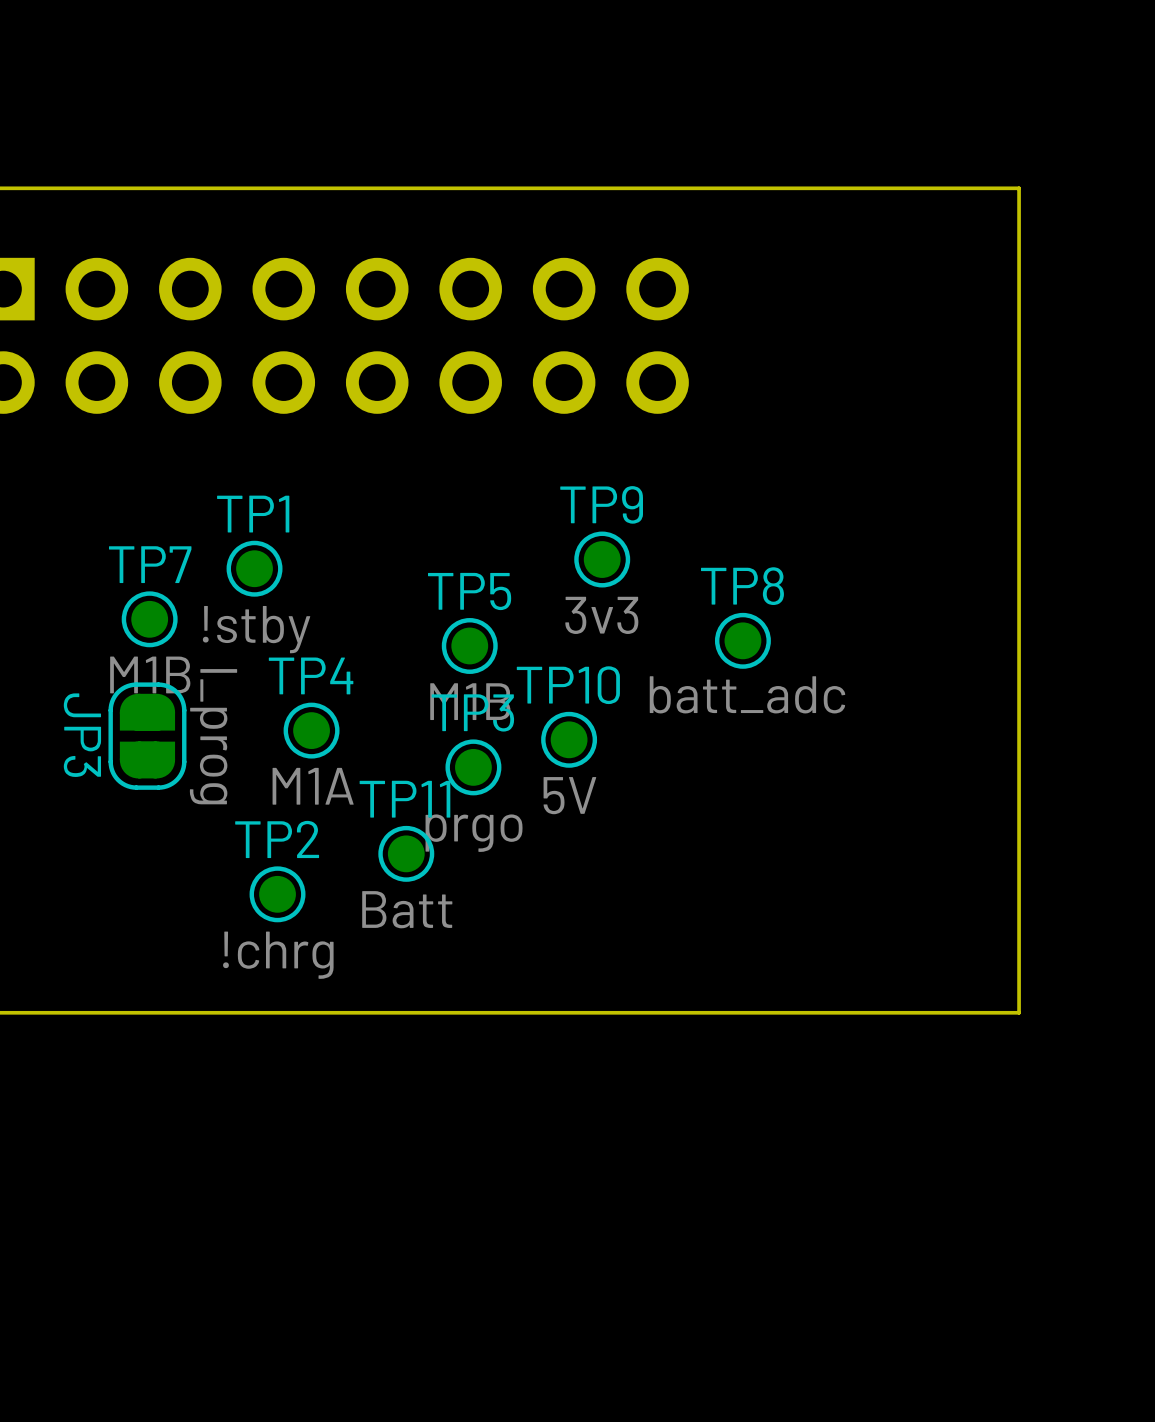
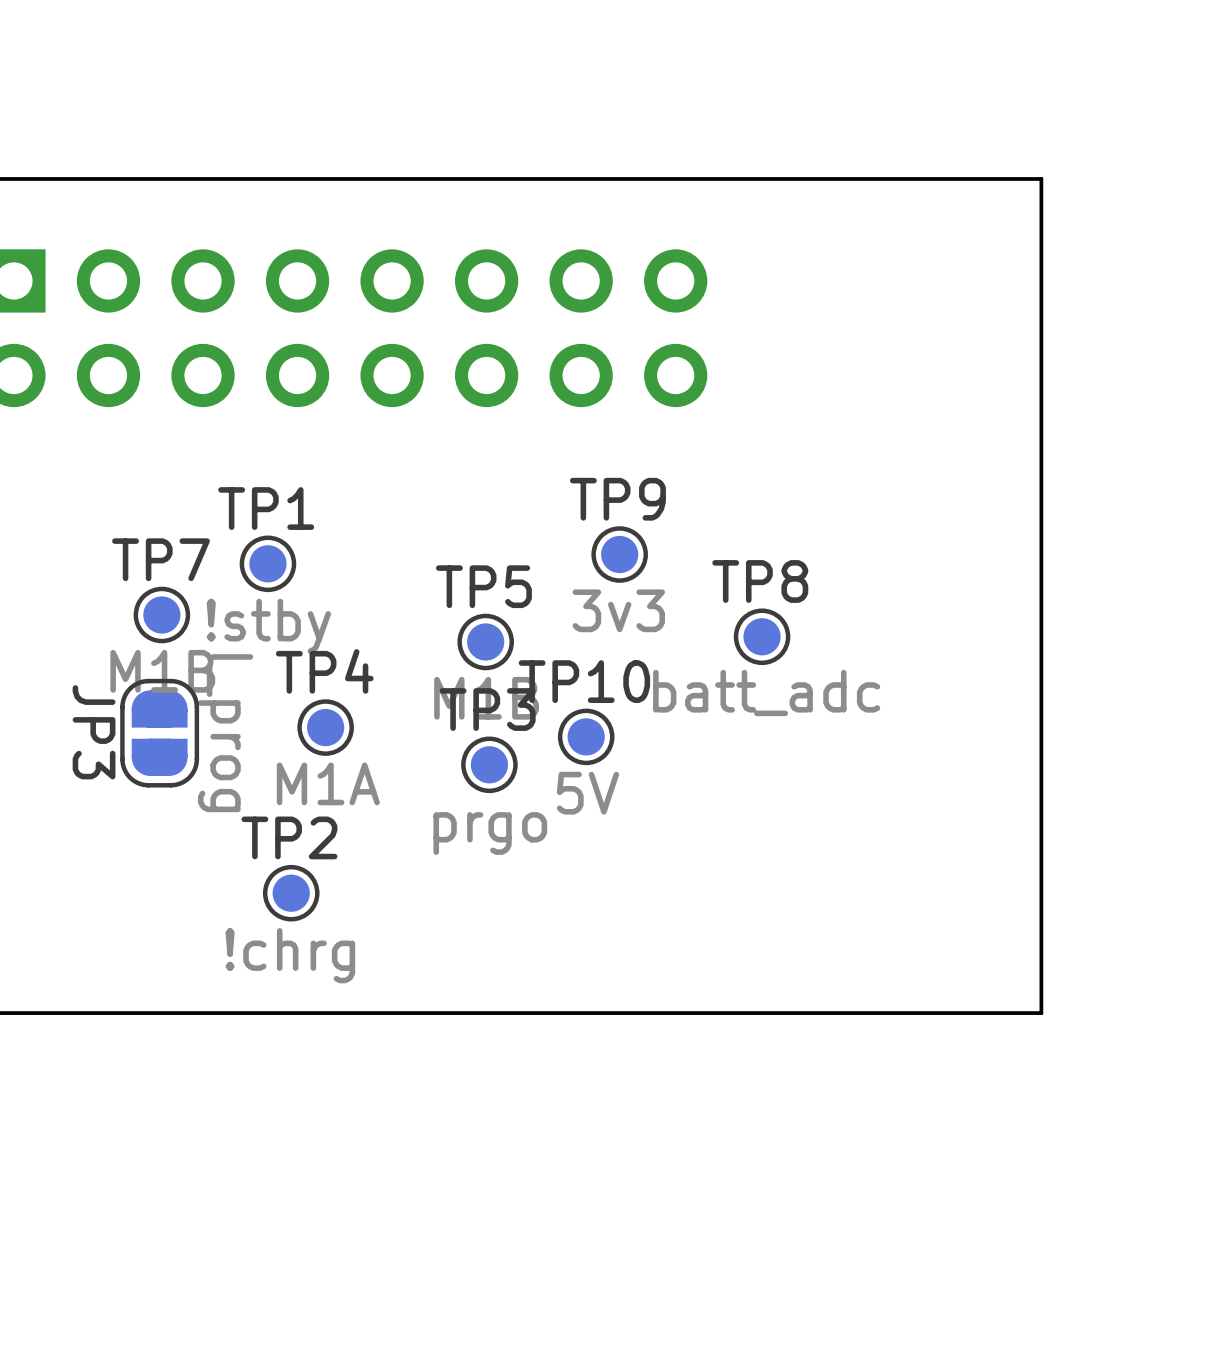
TP11: Batt (406, 853) -> none

